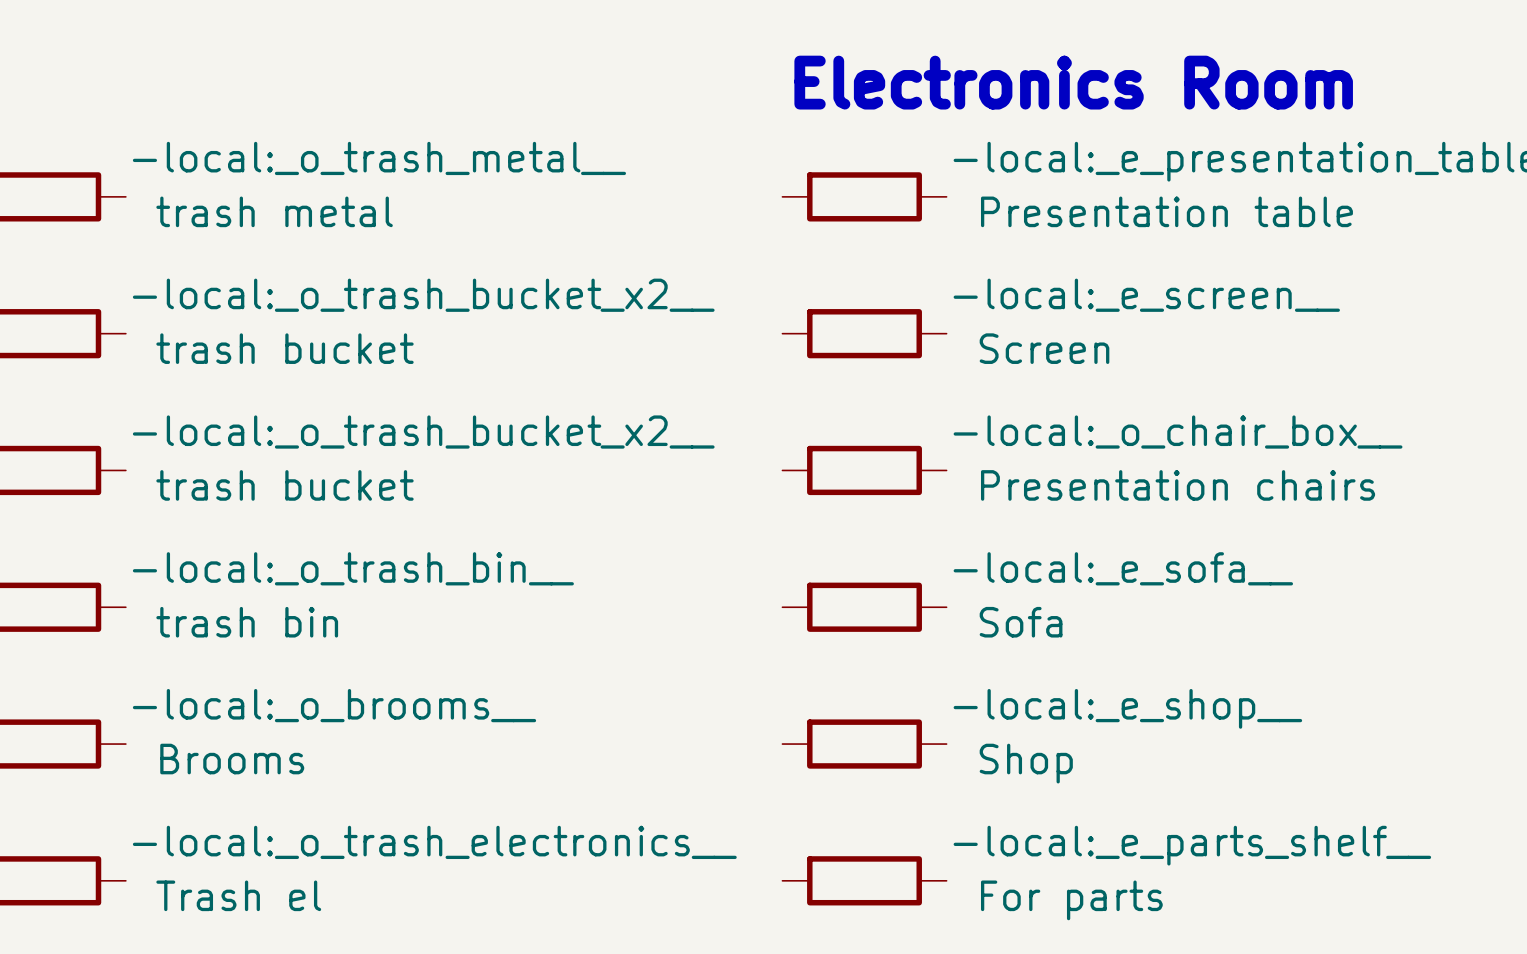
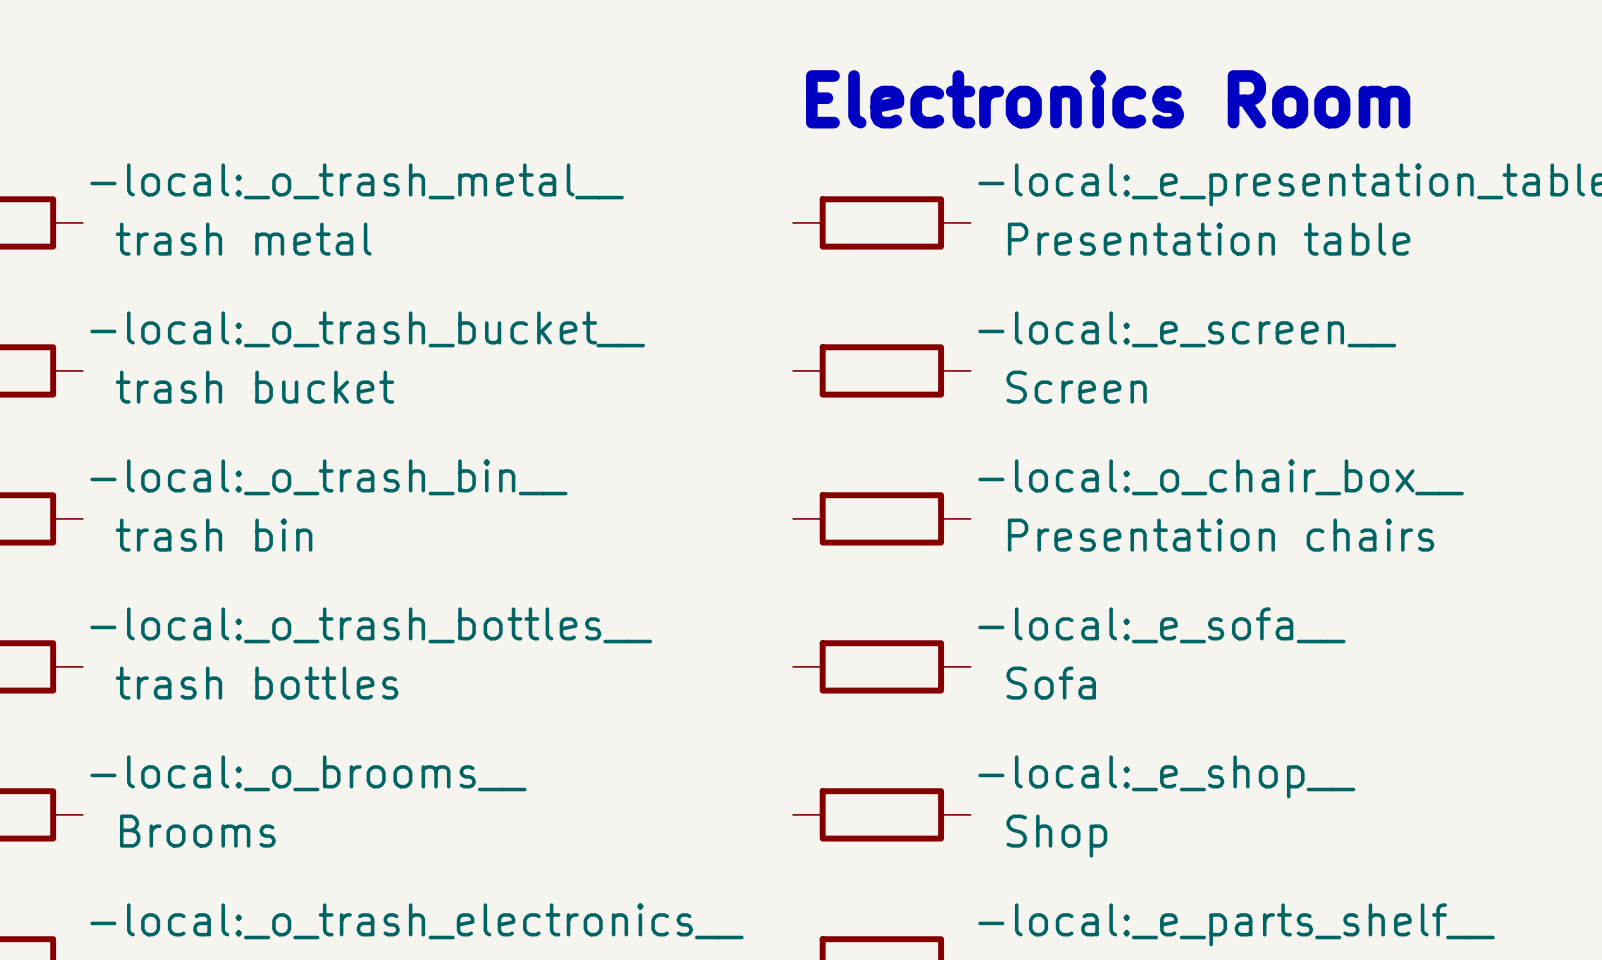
part text: -local:_o_trash_bucket_x2__ (423, 295) -> -local:_o_trash_bucket__ (367, 329)
part text: -local:_o_trash_bucket_x2__ (423, 432) -> -local:_o_trash_bin__ (328, 477)
part value: trash bucket (284, 485) -> trash bin (214, 535)
part text: -local:_o_trash_bin__ (353, 568) -> -local:_o_trash_bottles__ (371, 625)
part value: trash bin (247, 622) -> trash bottles (257, 683)

